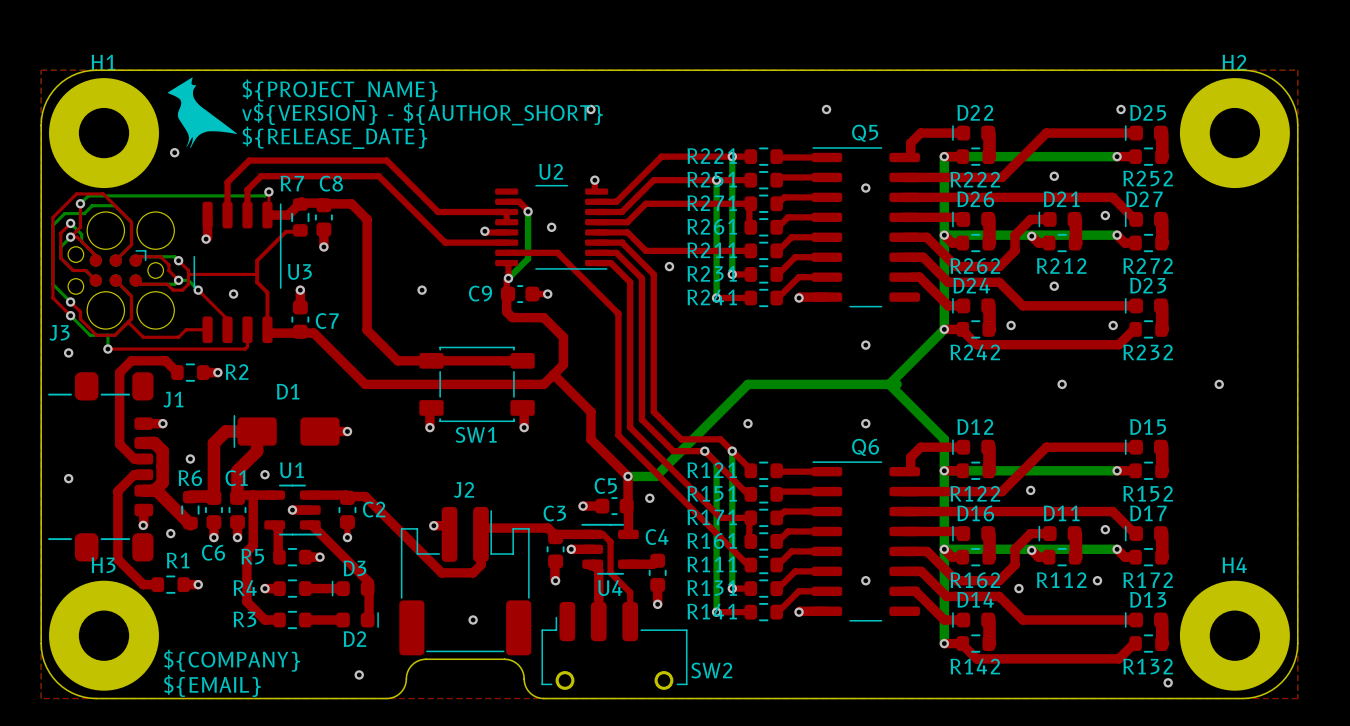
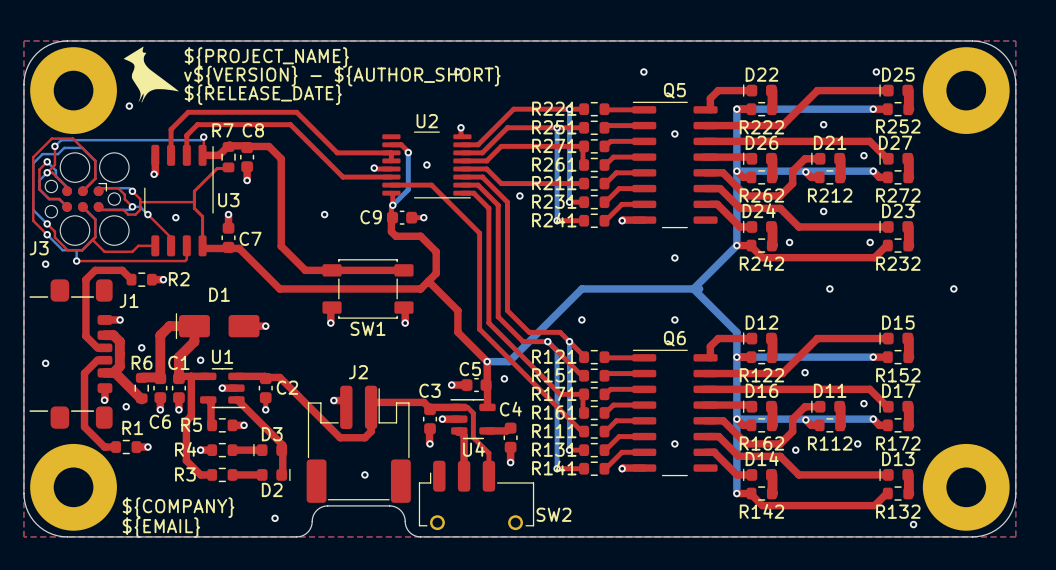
H1 name: H1 (103, 62) -> none
H2 name: H2 (1234, 62) -> none
H3 name: H3 (103, 565) -> none
H4 name: H4 (1234, 565) -> none

